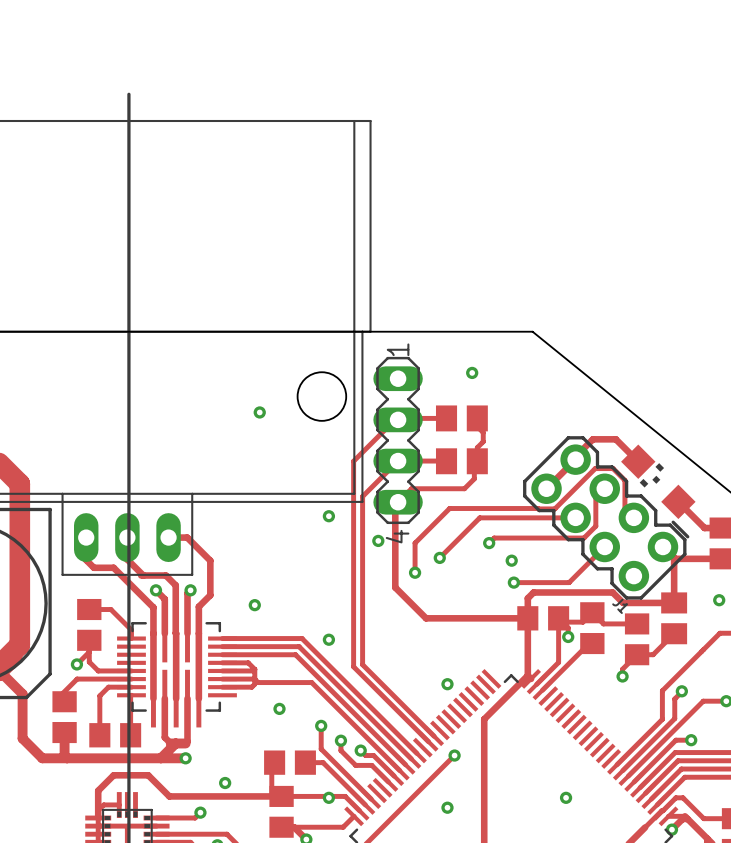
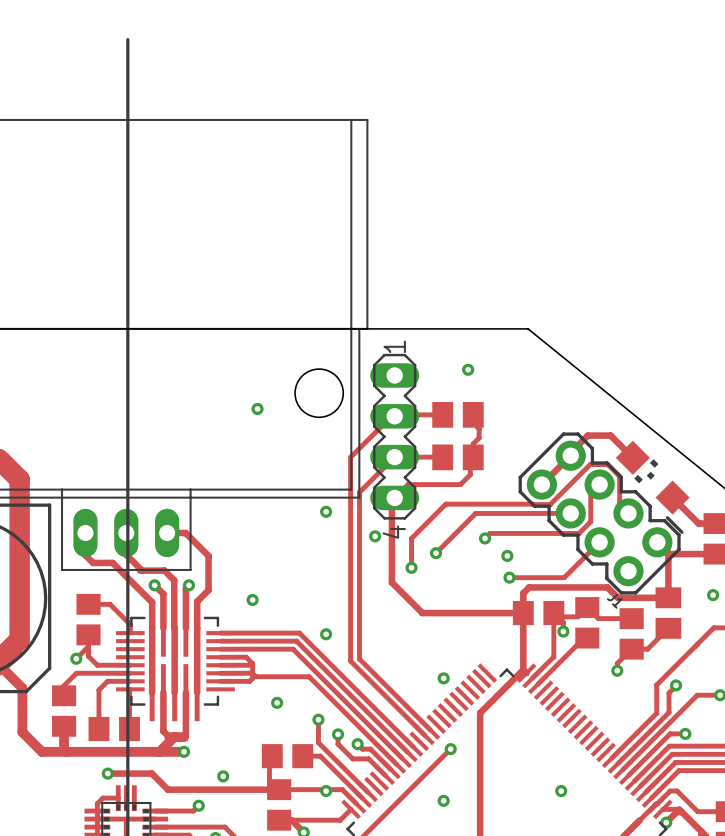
line: none -> (127, 39) (127, 93)
via: none -> (107, 773)
track: (153, 780) (148, 775) (113, 775) (98, 790) (98, 818) -> (151, 773) (107, 773)

